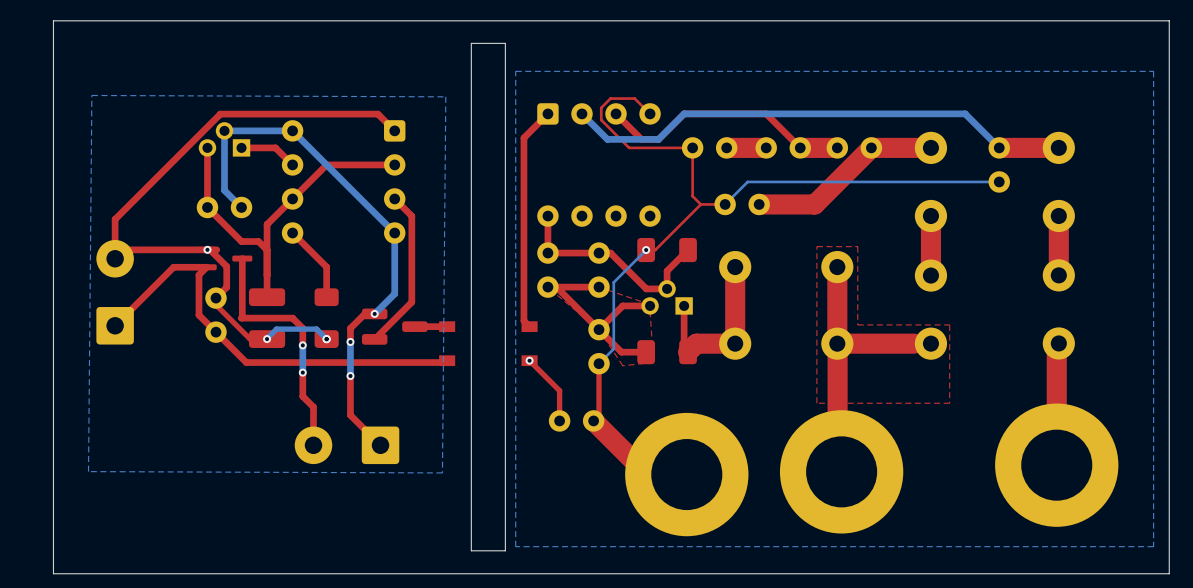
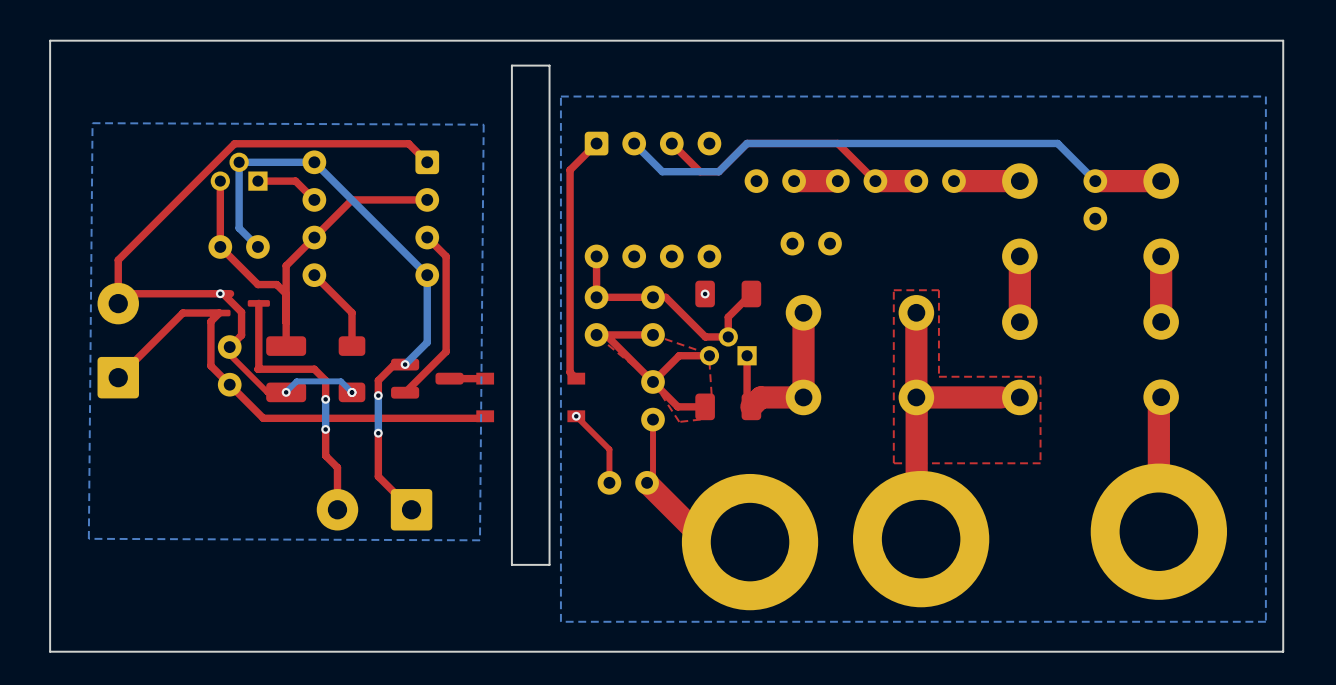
top track: (650, 113) (634, 98) (610, 98) (601, 107) (601, 120) (629, 147) (692, 147) (692, 196) (700, 204) -> none
top track: (871, 147) (814, 204) (759, 204) -> none
bottom track: (999, 181) (747, 181) (725, 204) -> none
top track: (700, 204) (655, 250) (646, 250) -> none
top track: (725, 204) (700, 204) -> none
bottom track: (646, 250) (613, 282) (613, 348) (599, 363) -> none
board edge: (505, 495) (505, 550) (471, 550) (471, 495) -> (549, 564) (511, 564)

